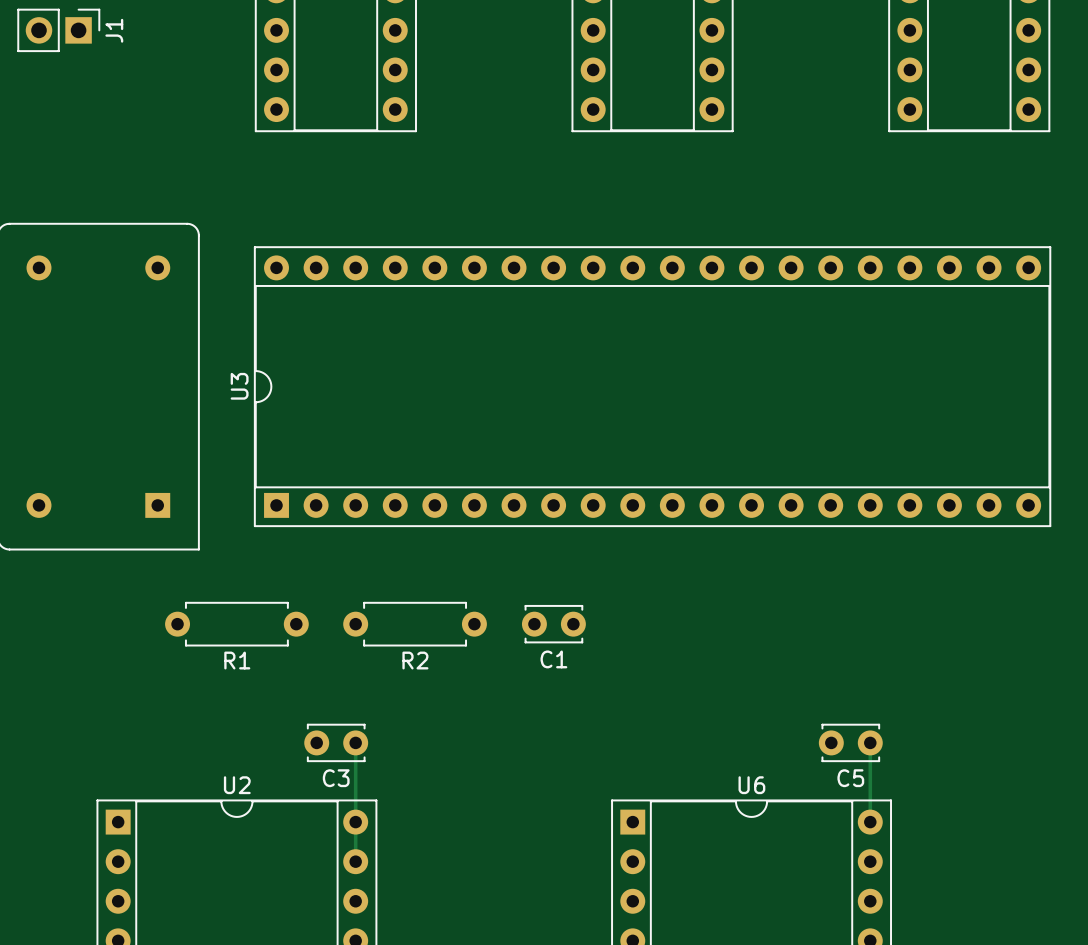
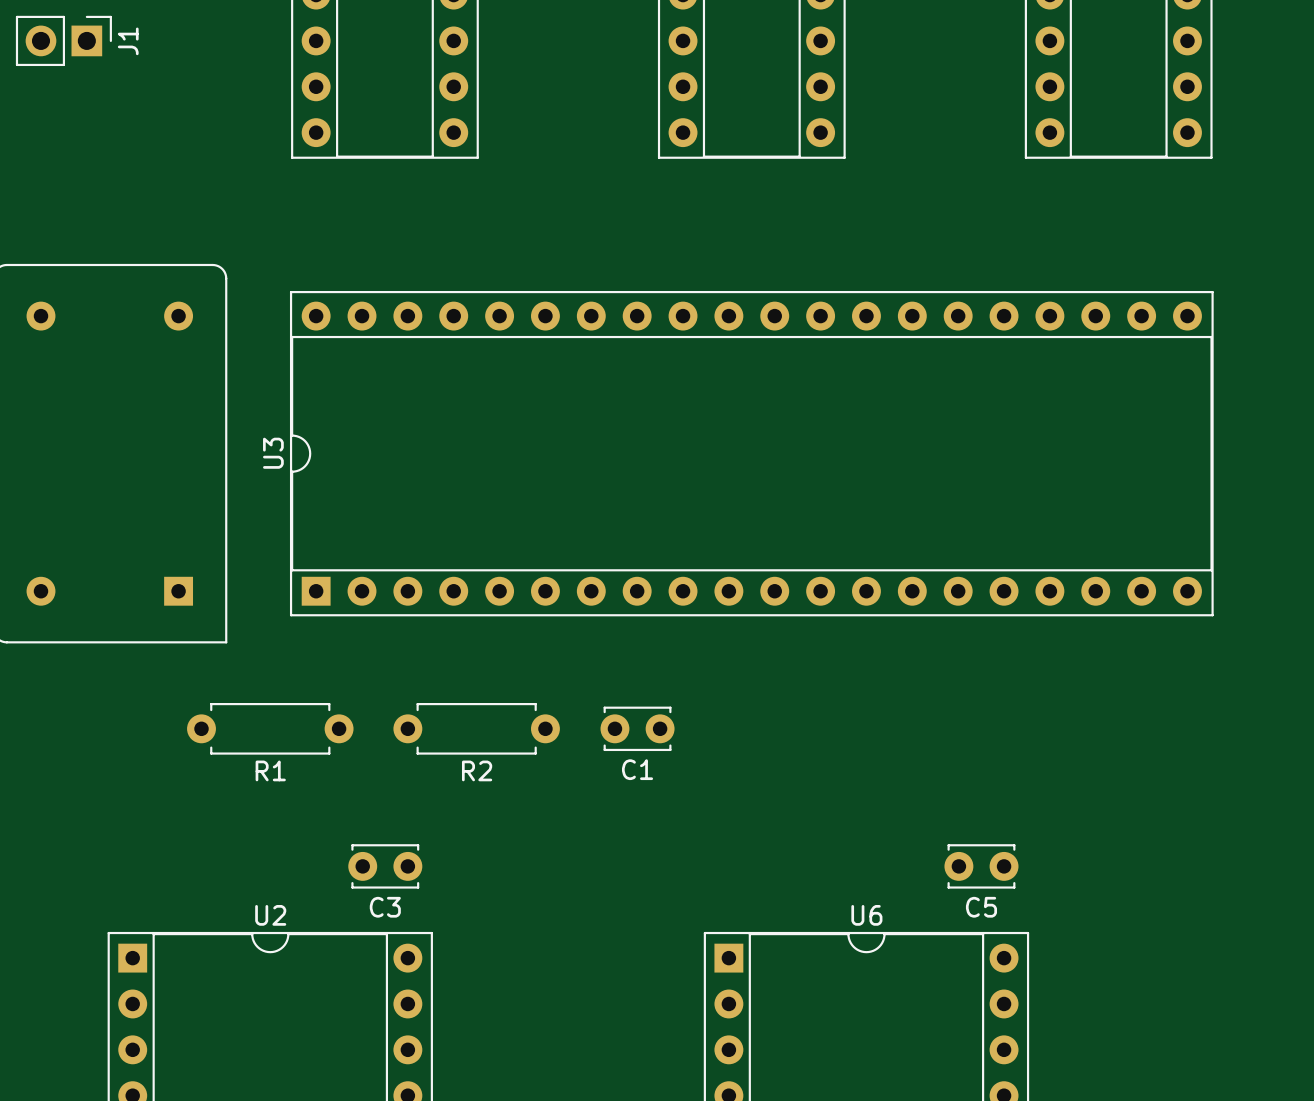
track: (355, 742) (355, 861) -> none
track: (870, 742) (870, 822) -> none

